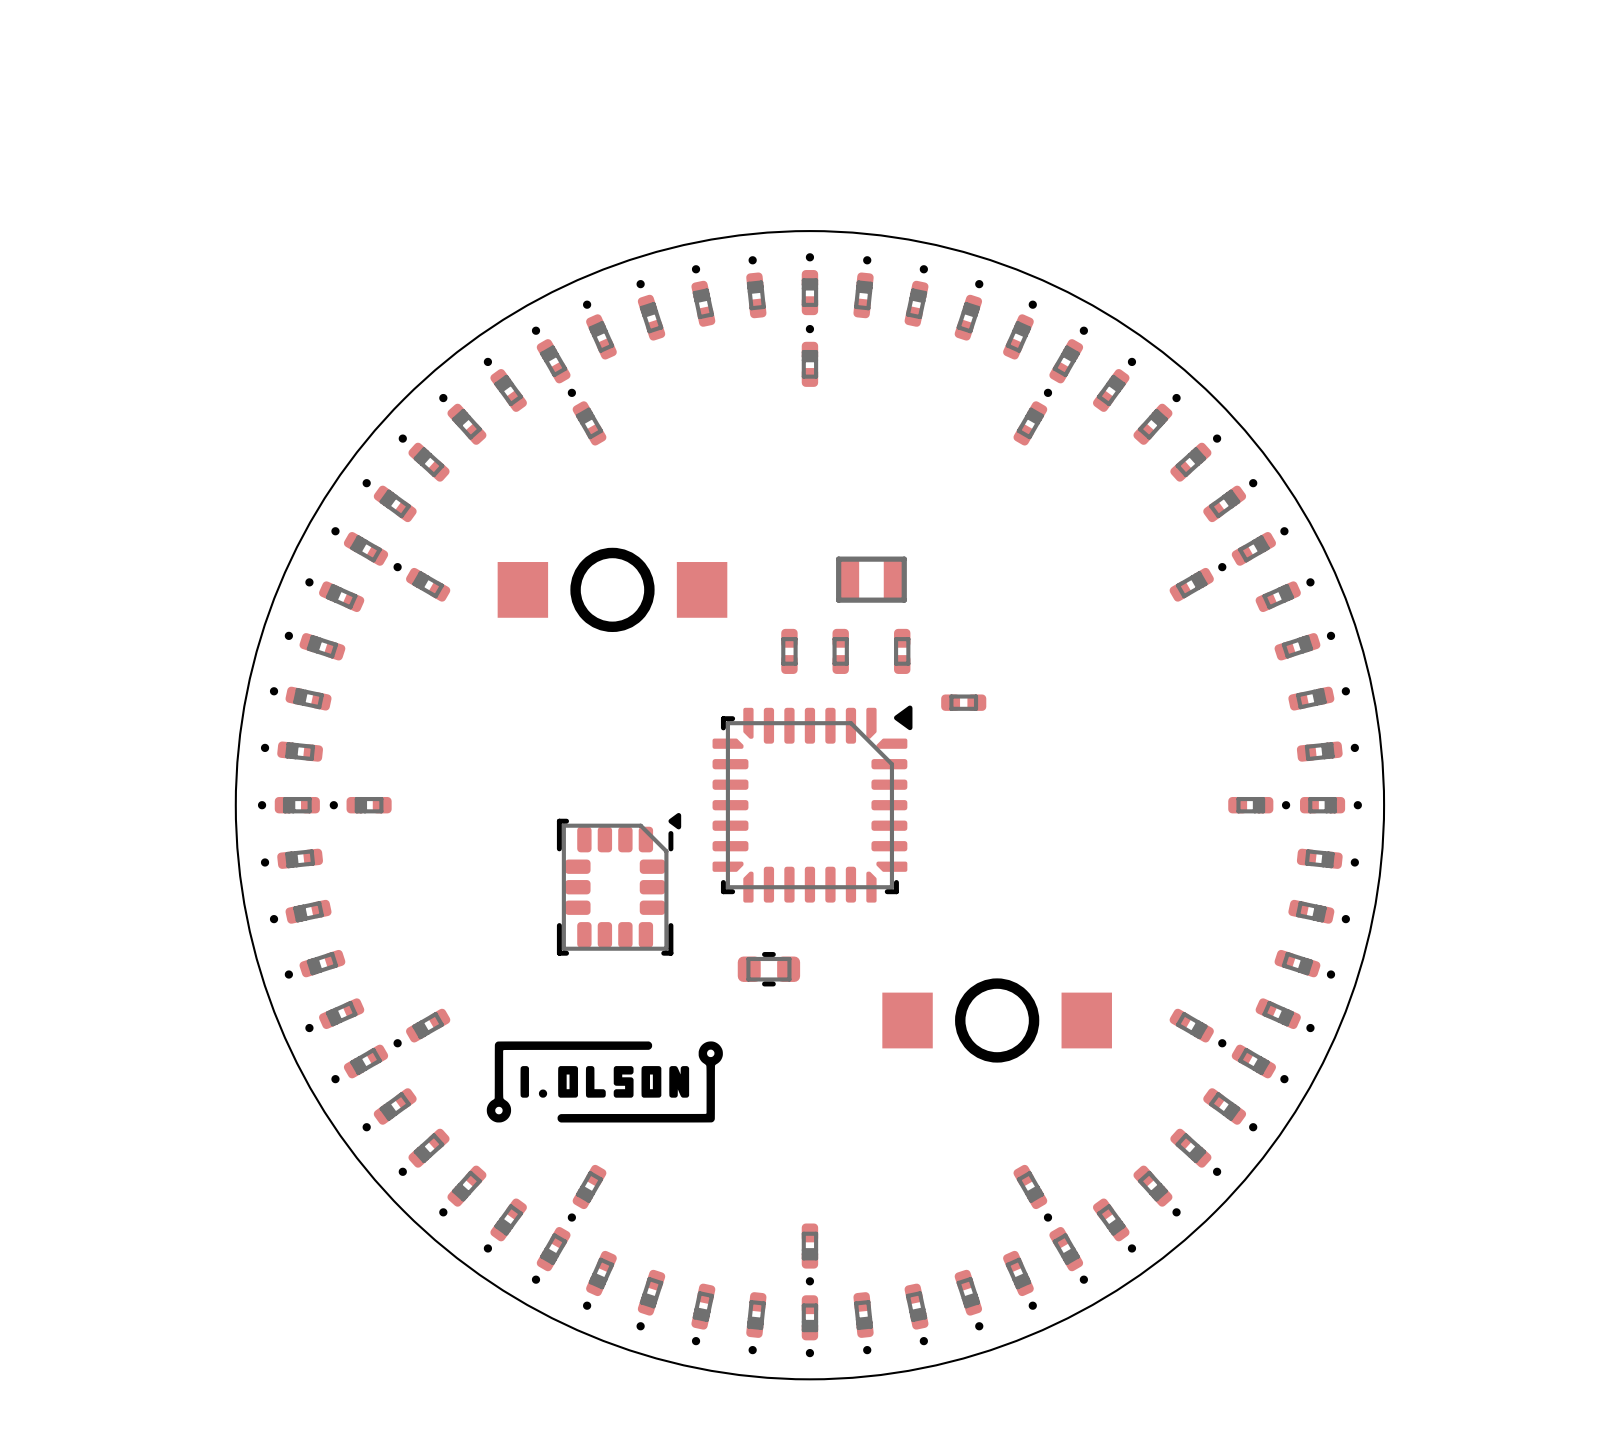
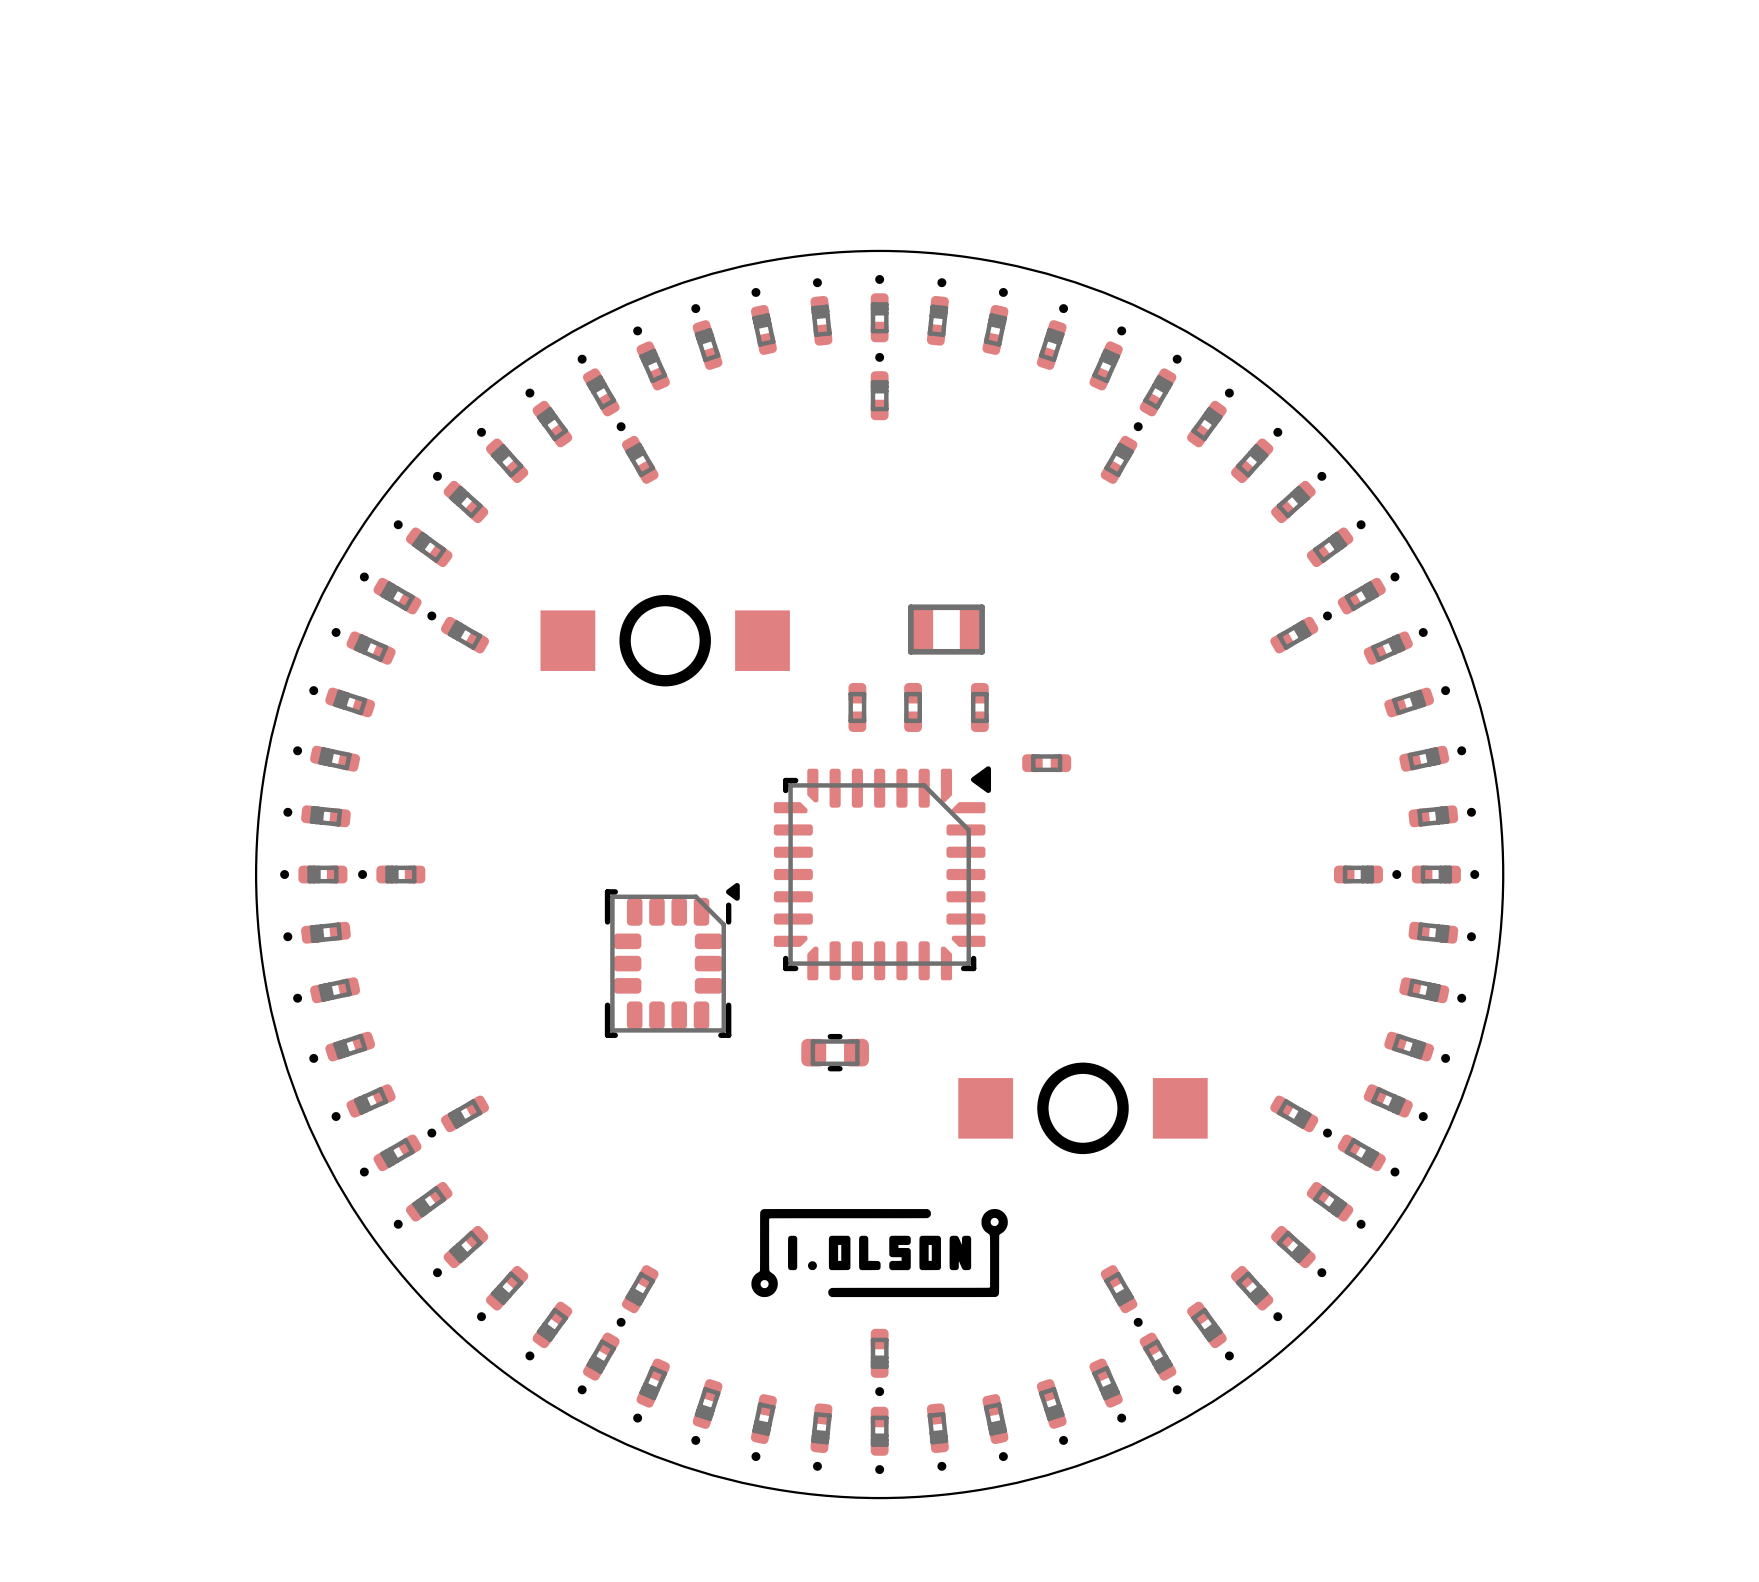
drawing position: (604, 1081) -> (879, 1253)

